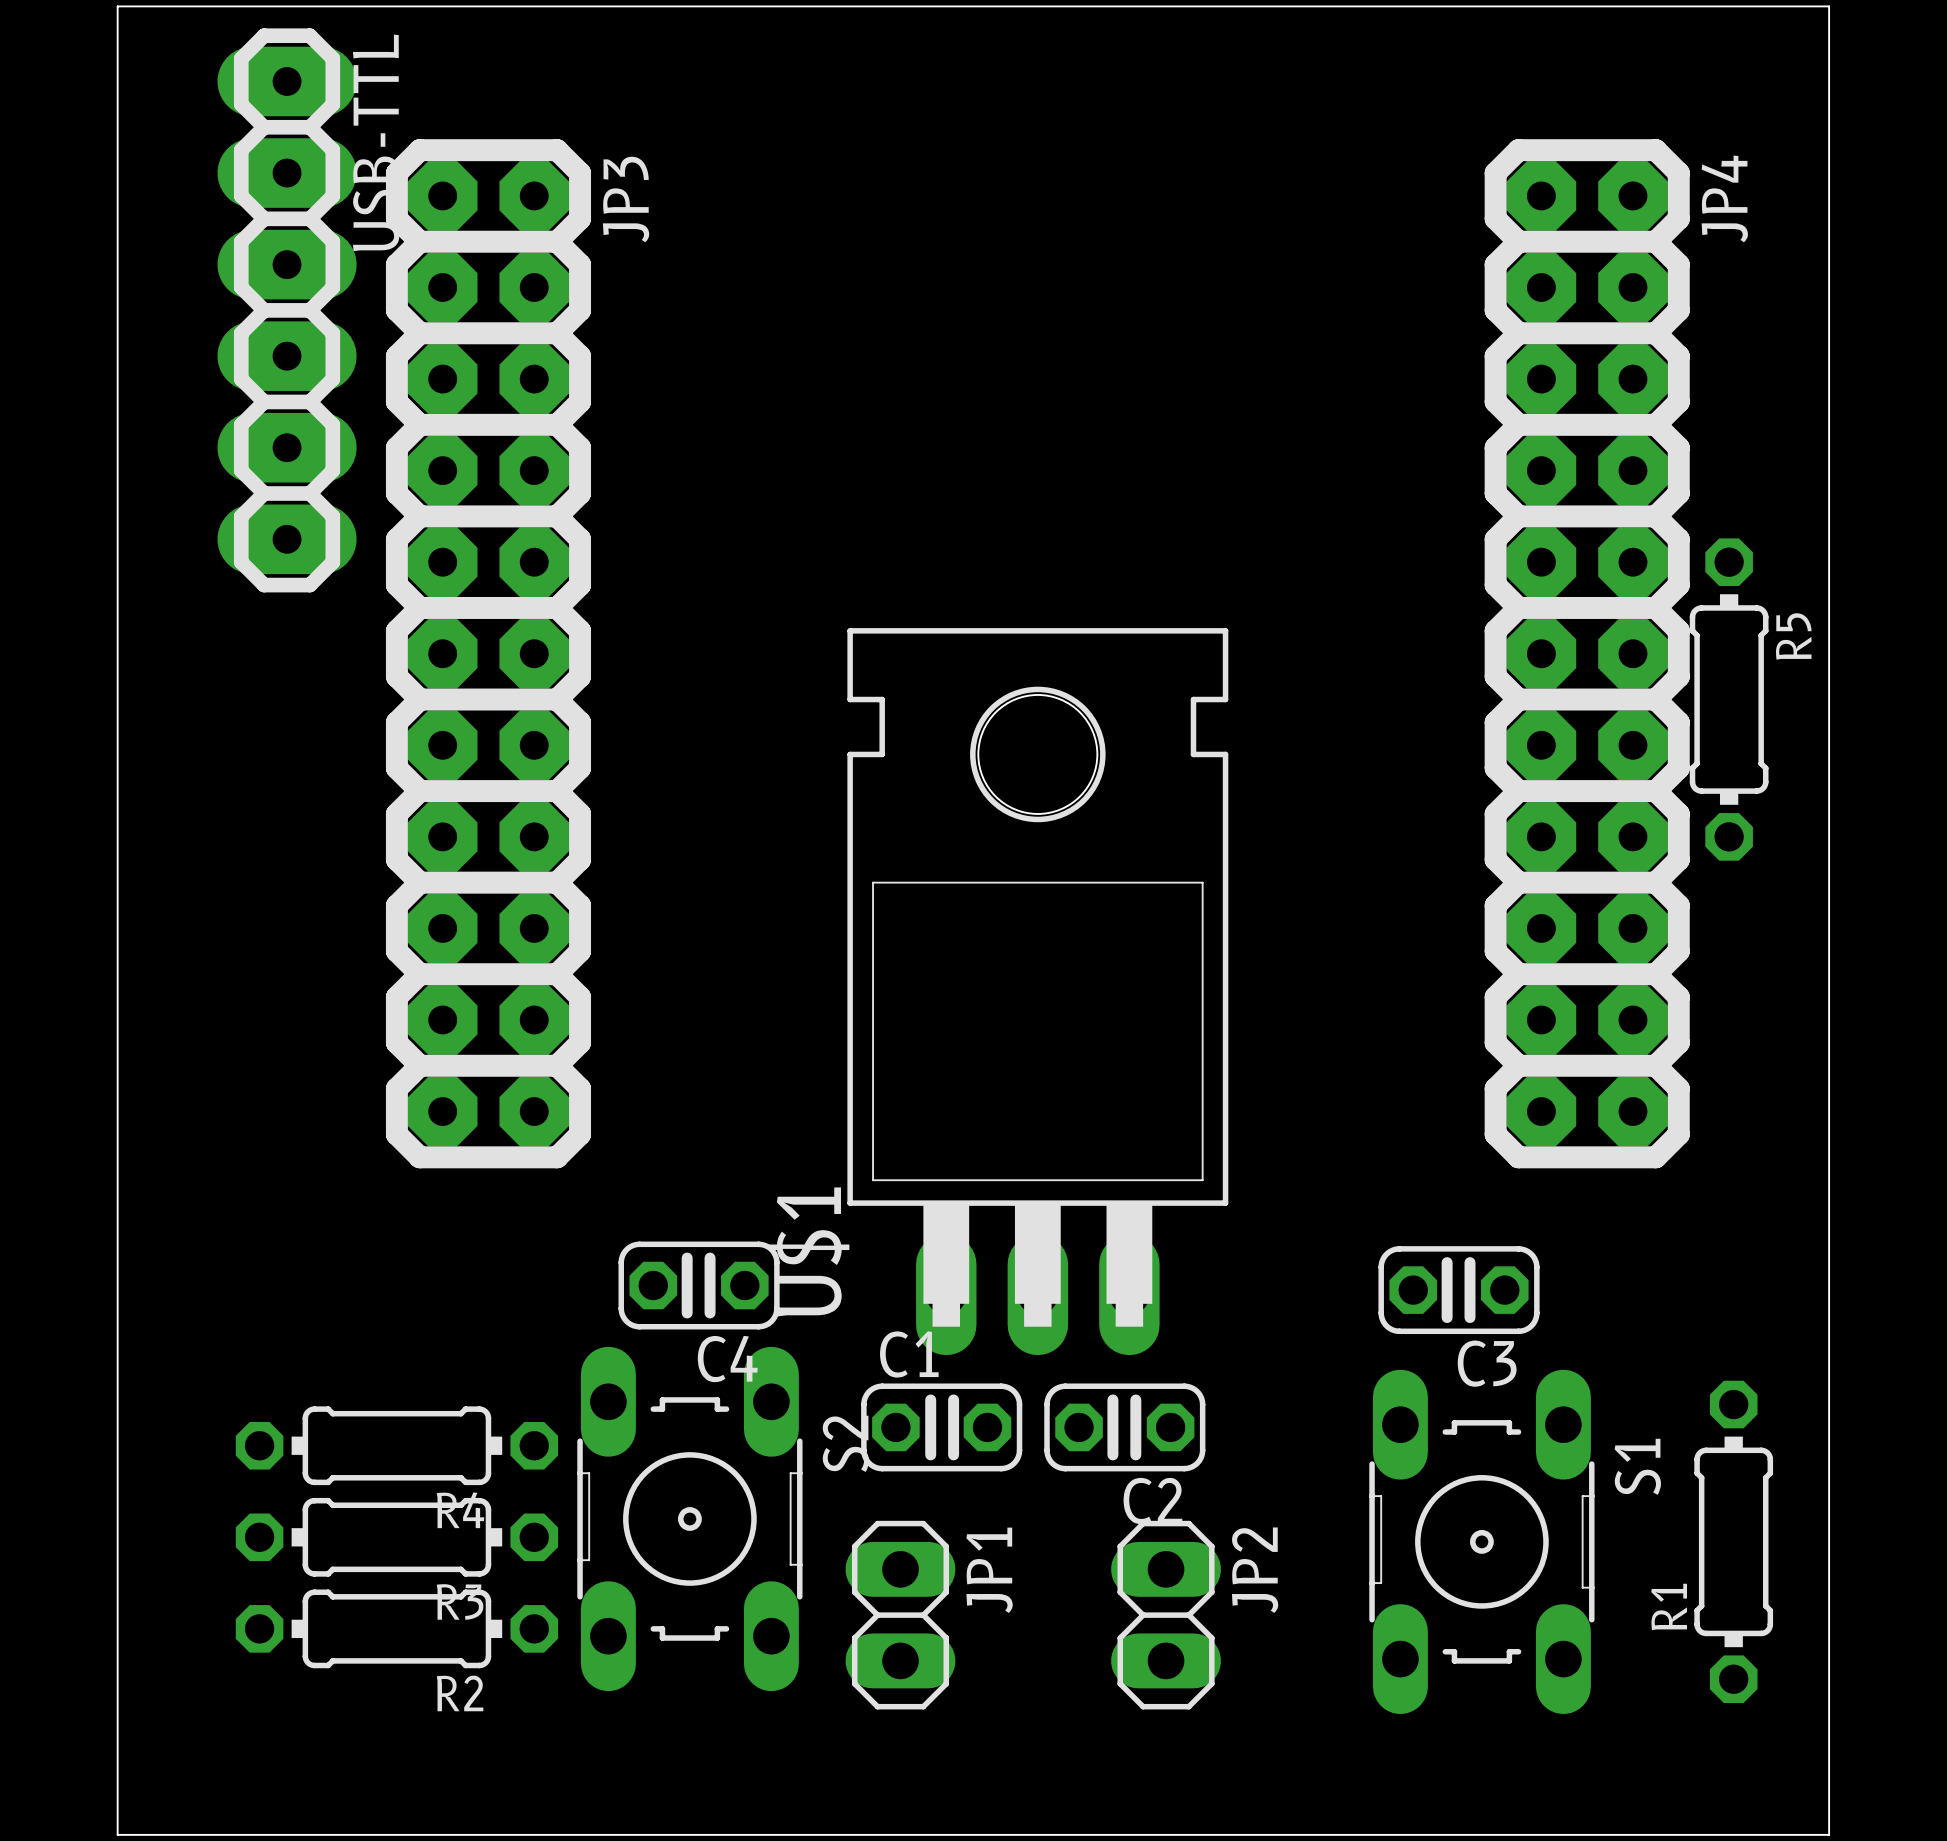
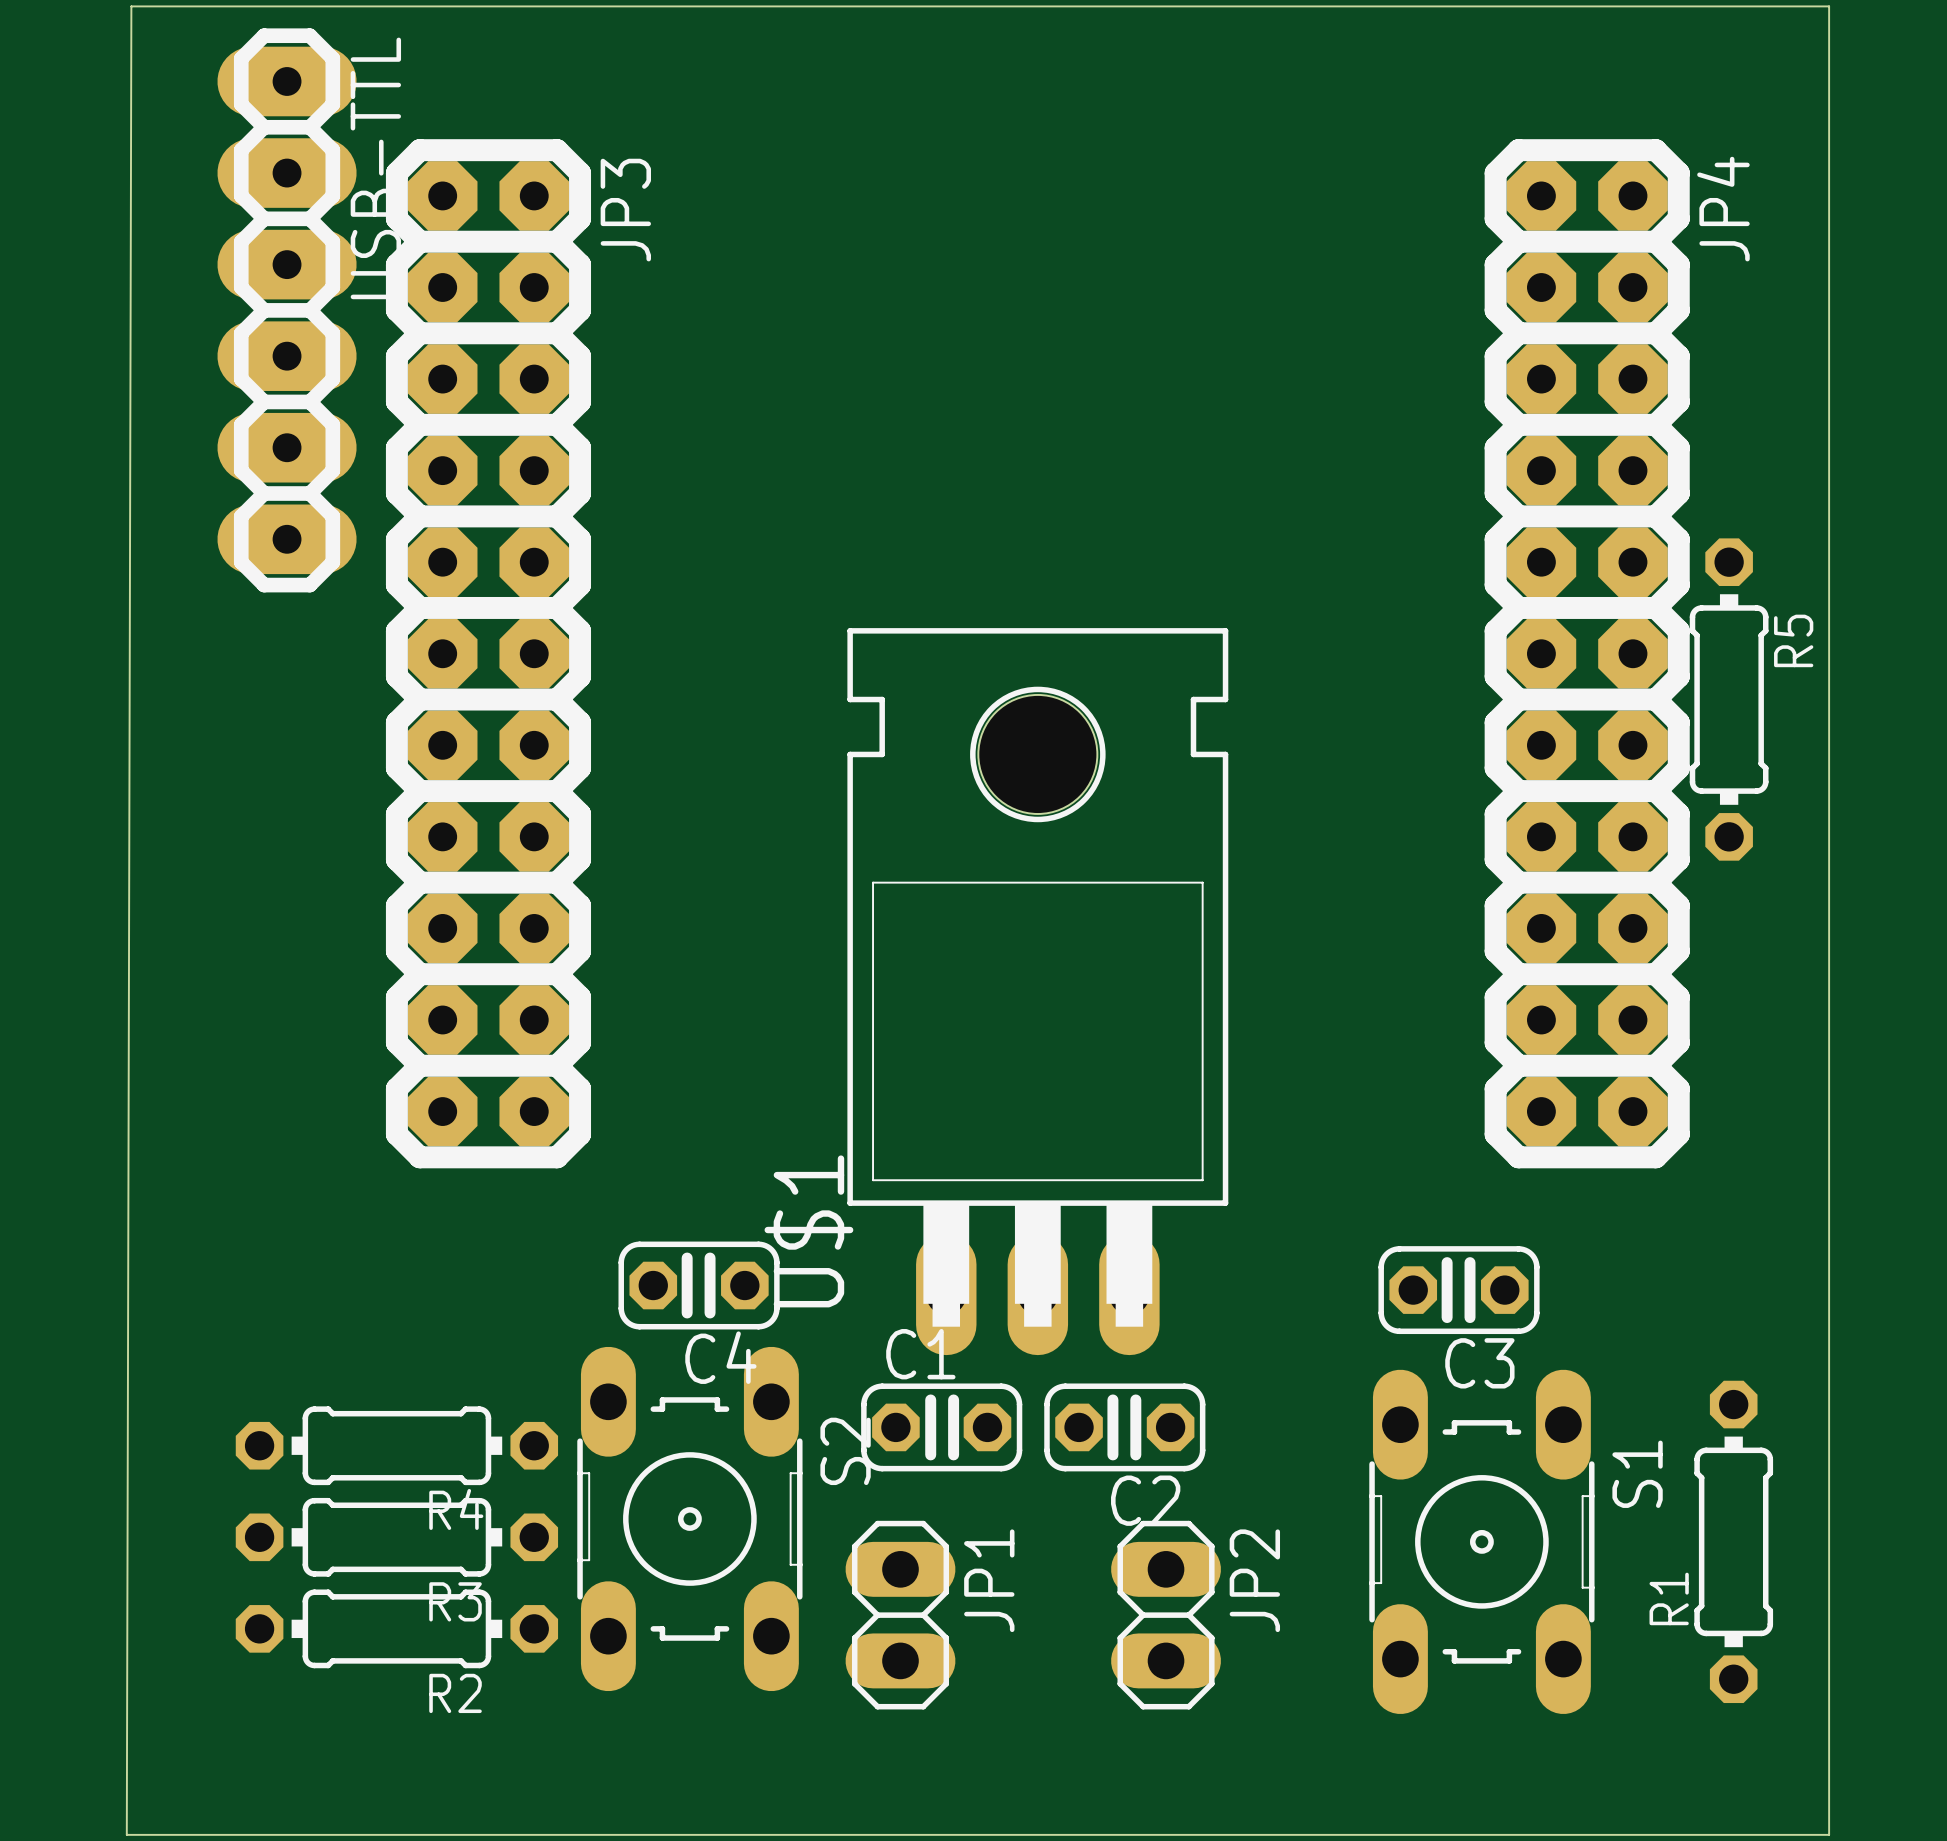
board edge: (131, 6) (117, 6) (117, 1834) (126, 1834) -> (131, 6) (126, 1834)

